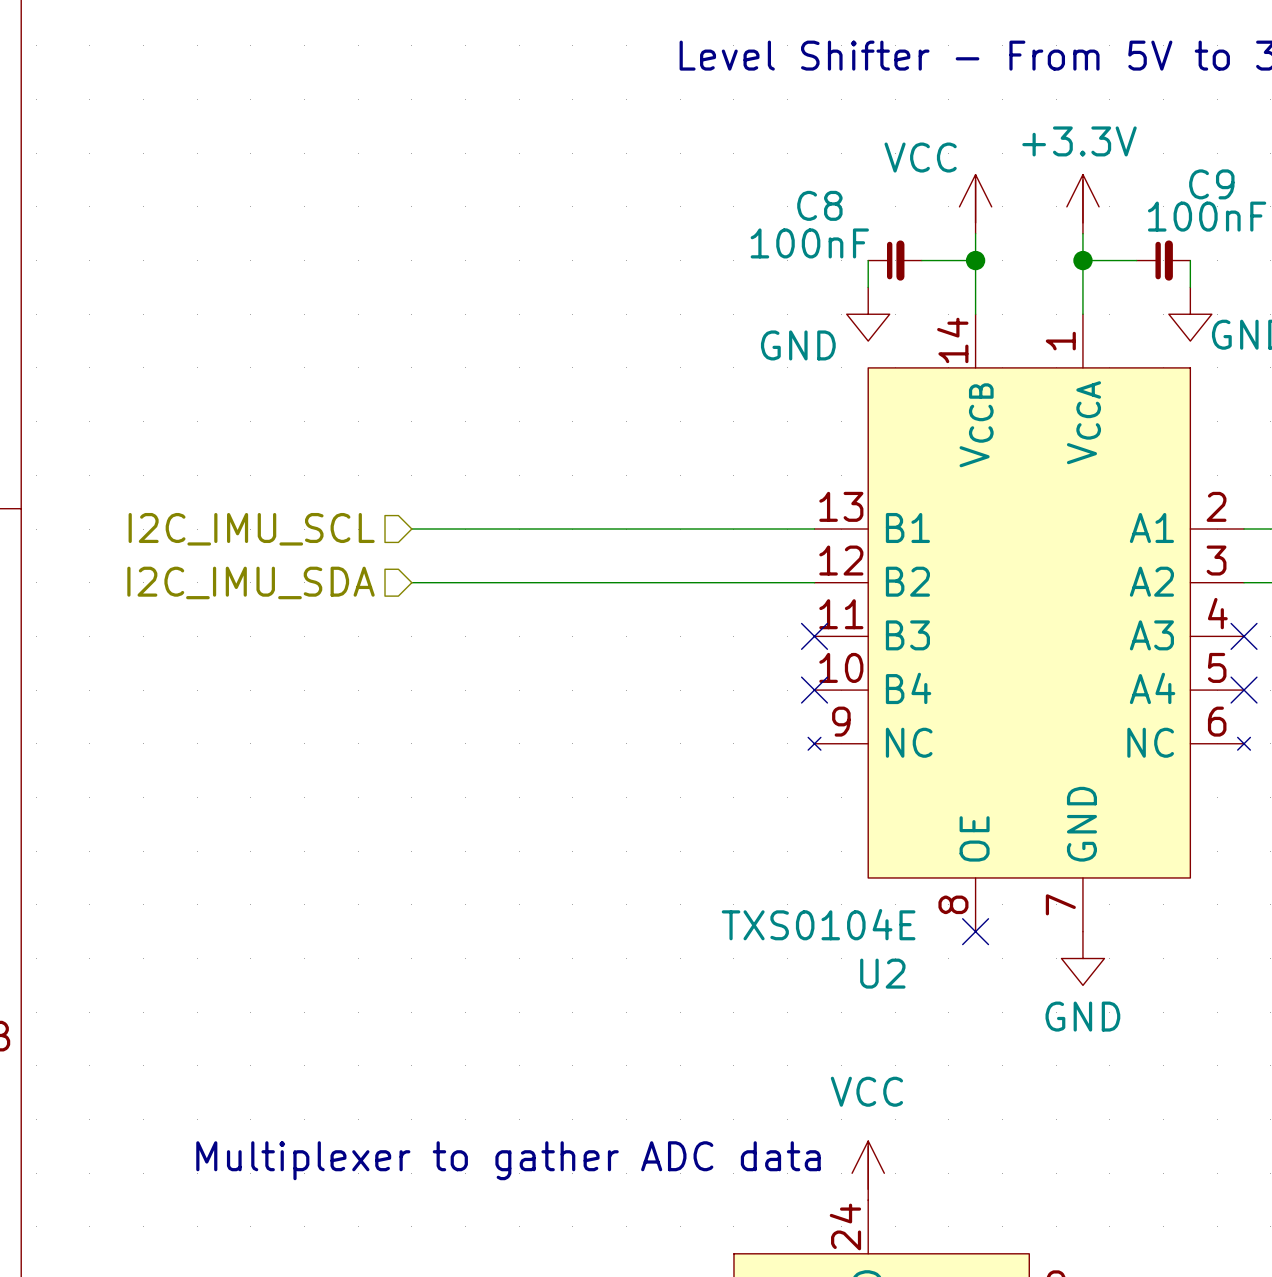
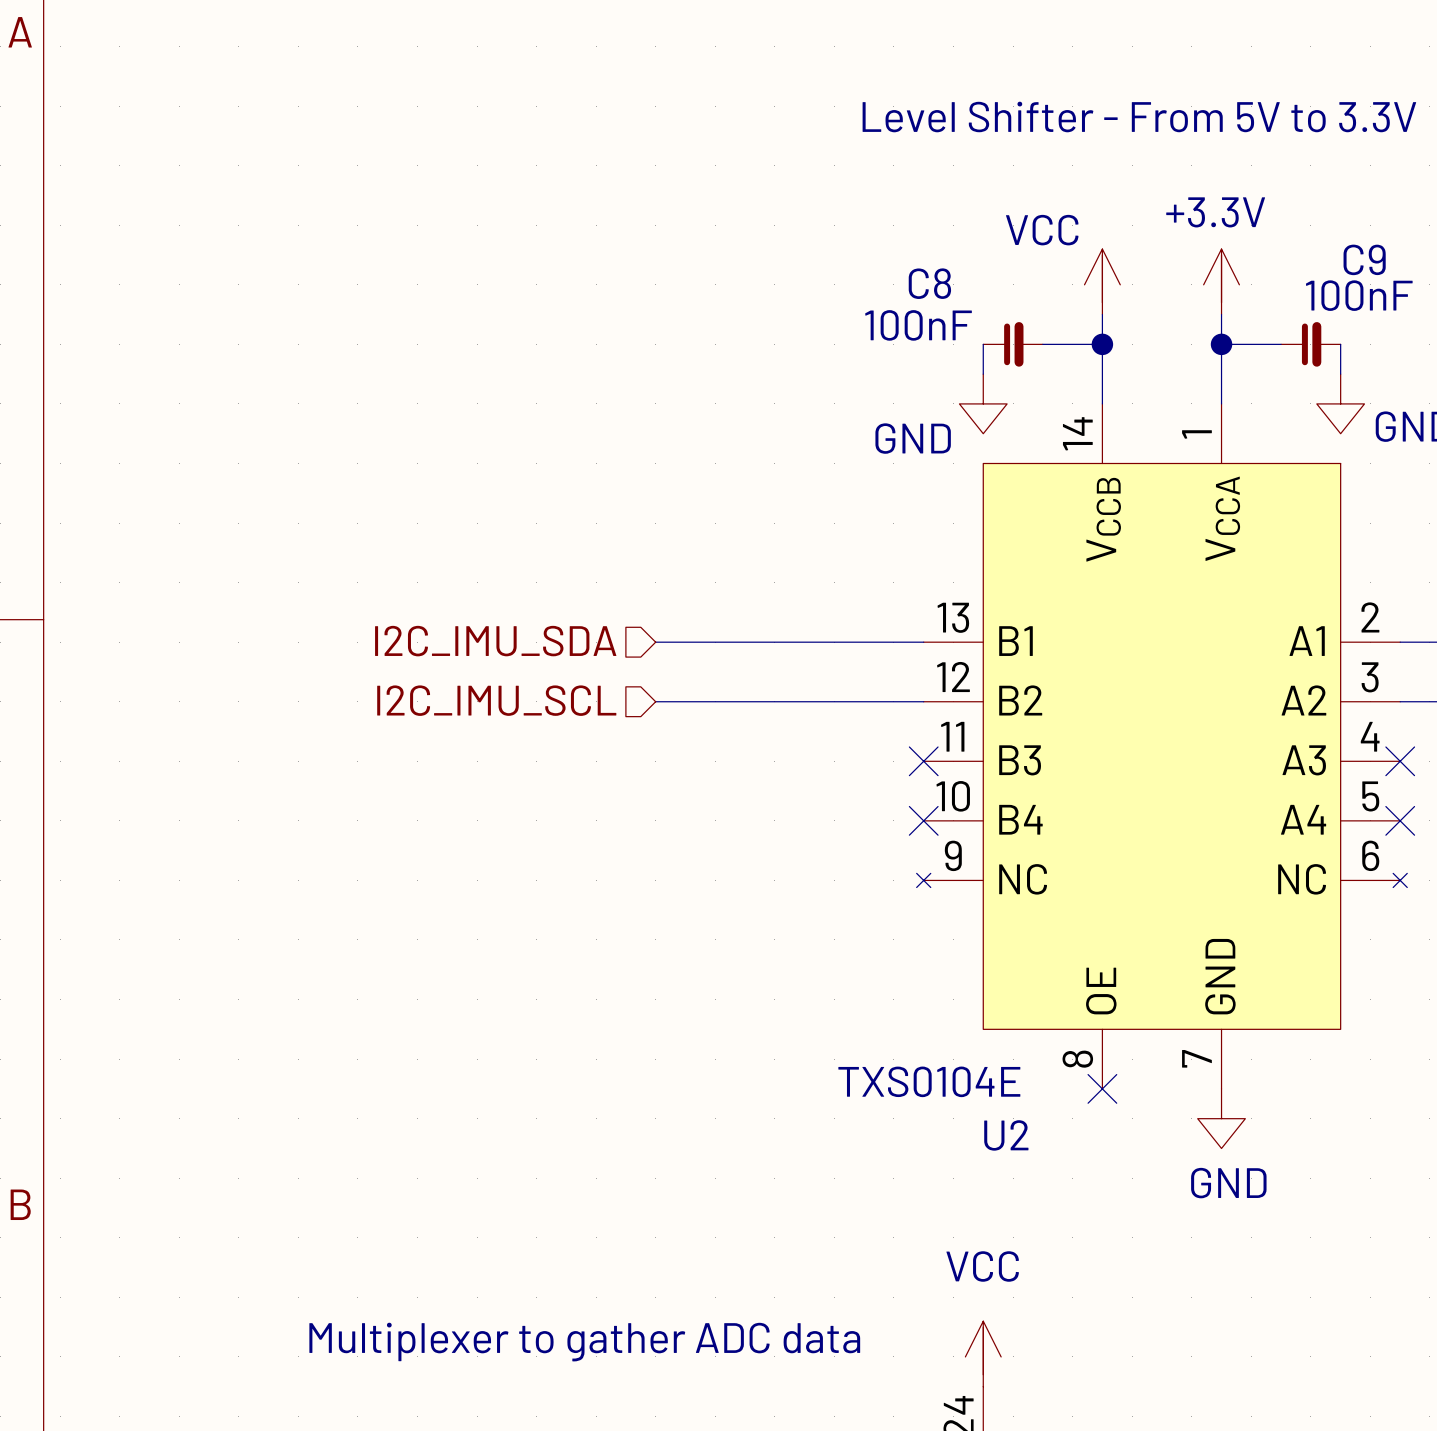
hierarchical label position: I2C_IMU_SCL (251, 529) -> I2C_IMU_SCL (496, 700)
wire: (411, 529) (572, 529) -> none
hierarchical label position: I2C_IMU_SDA (250, 582) -> I2C_IMU_SDA (495, 641)
wire: (411, 582) (572, 582) -> none

